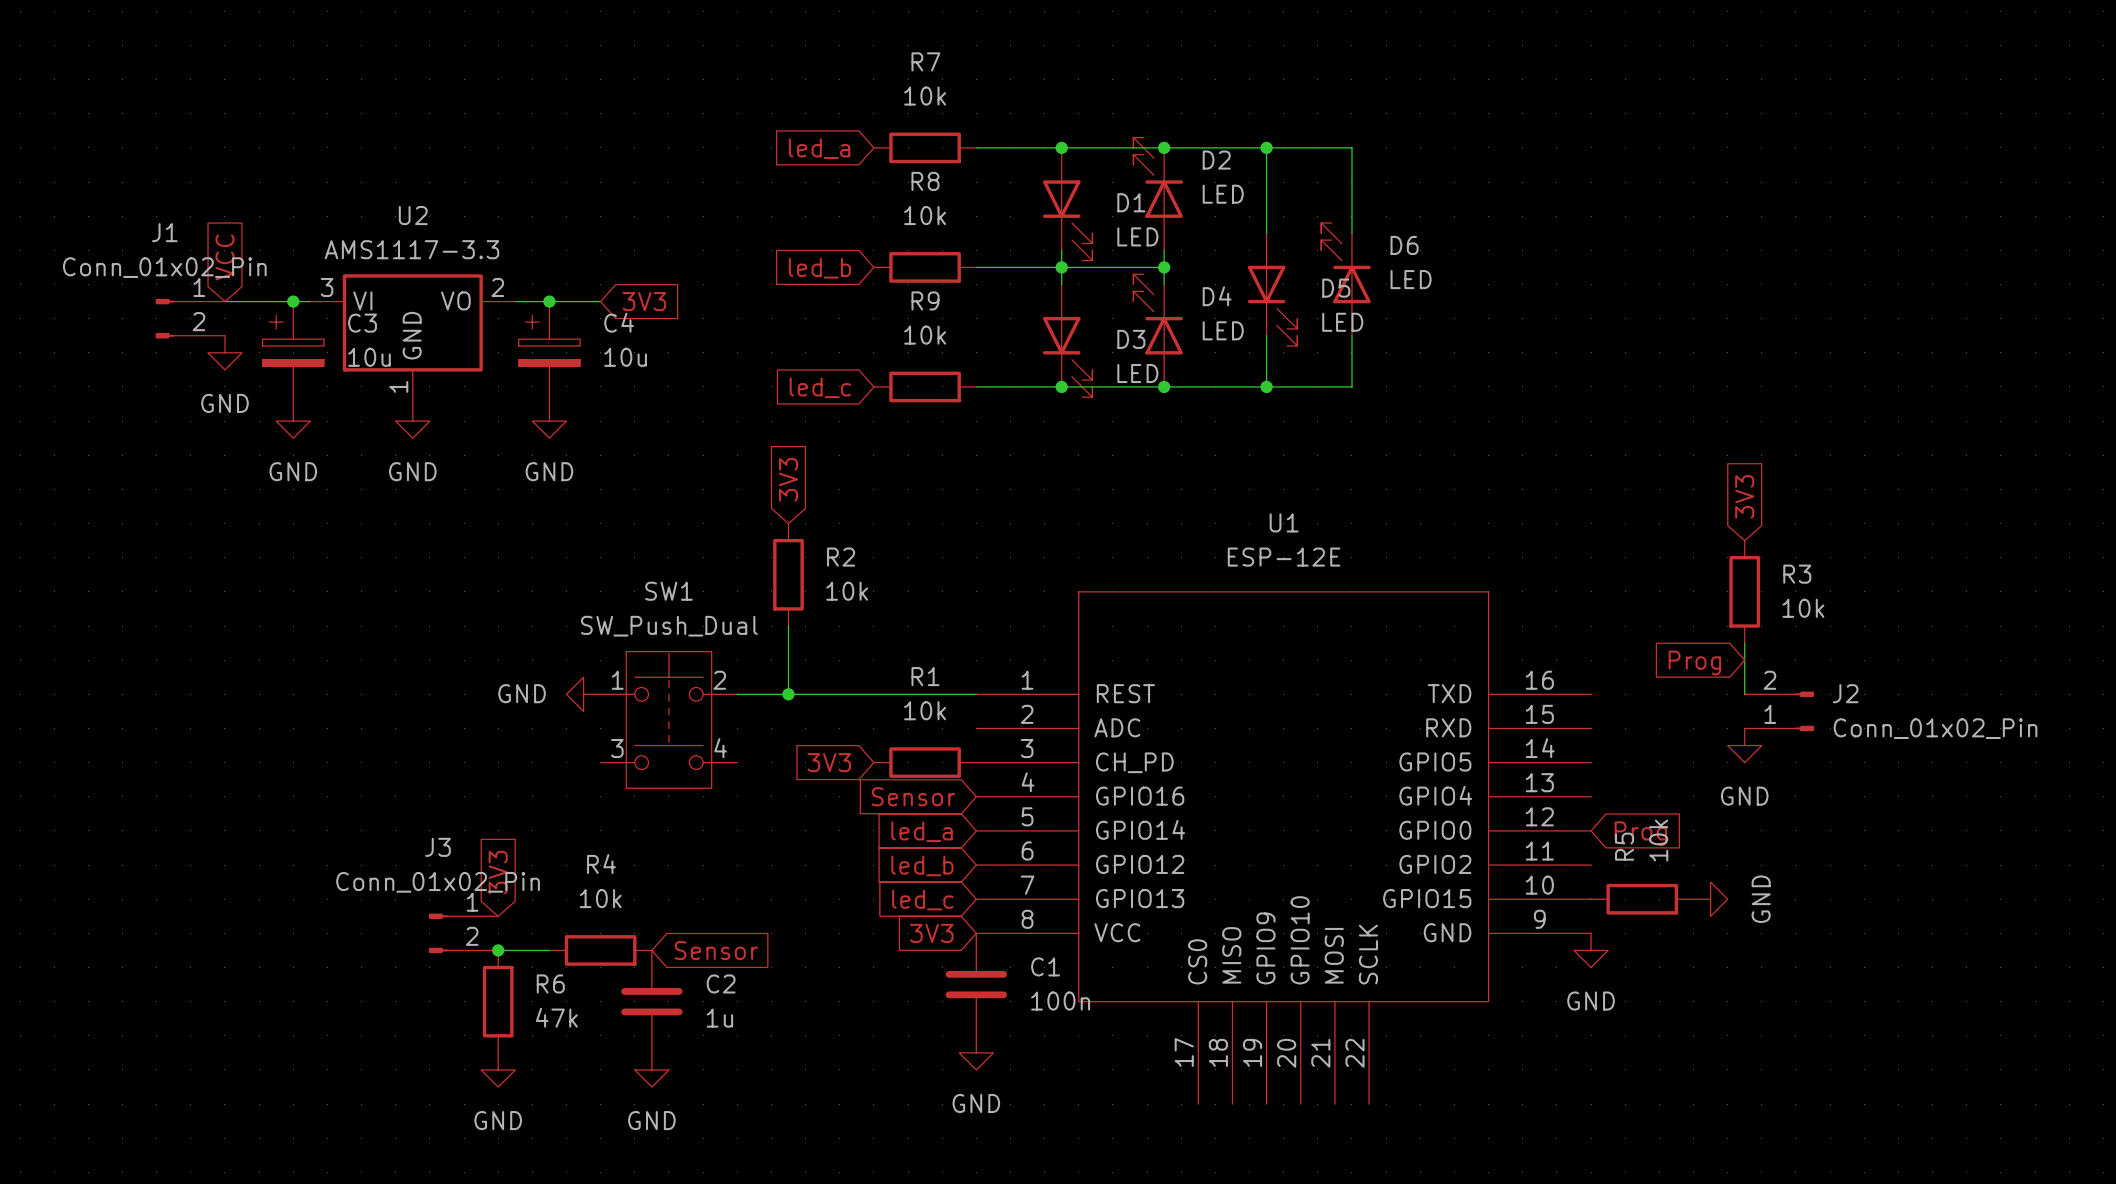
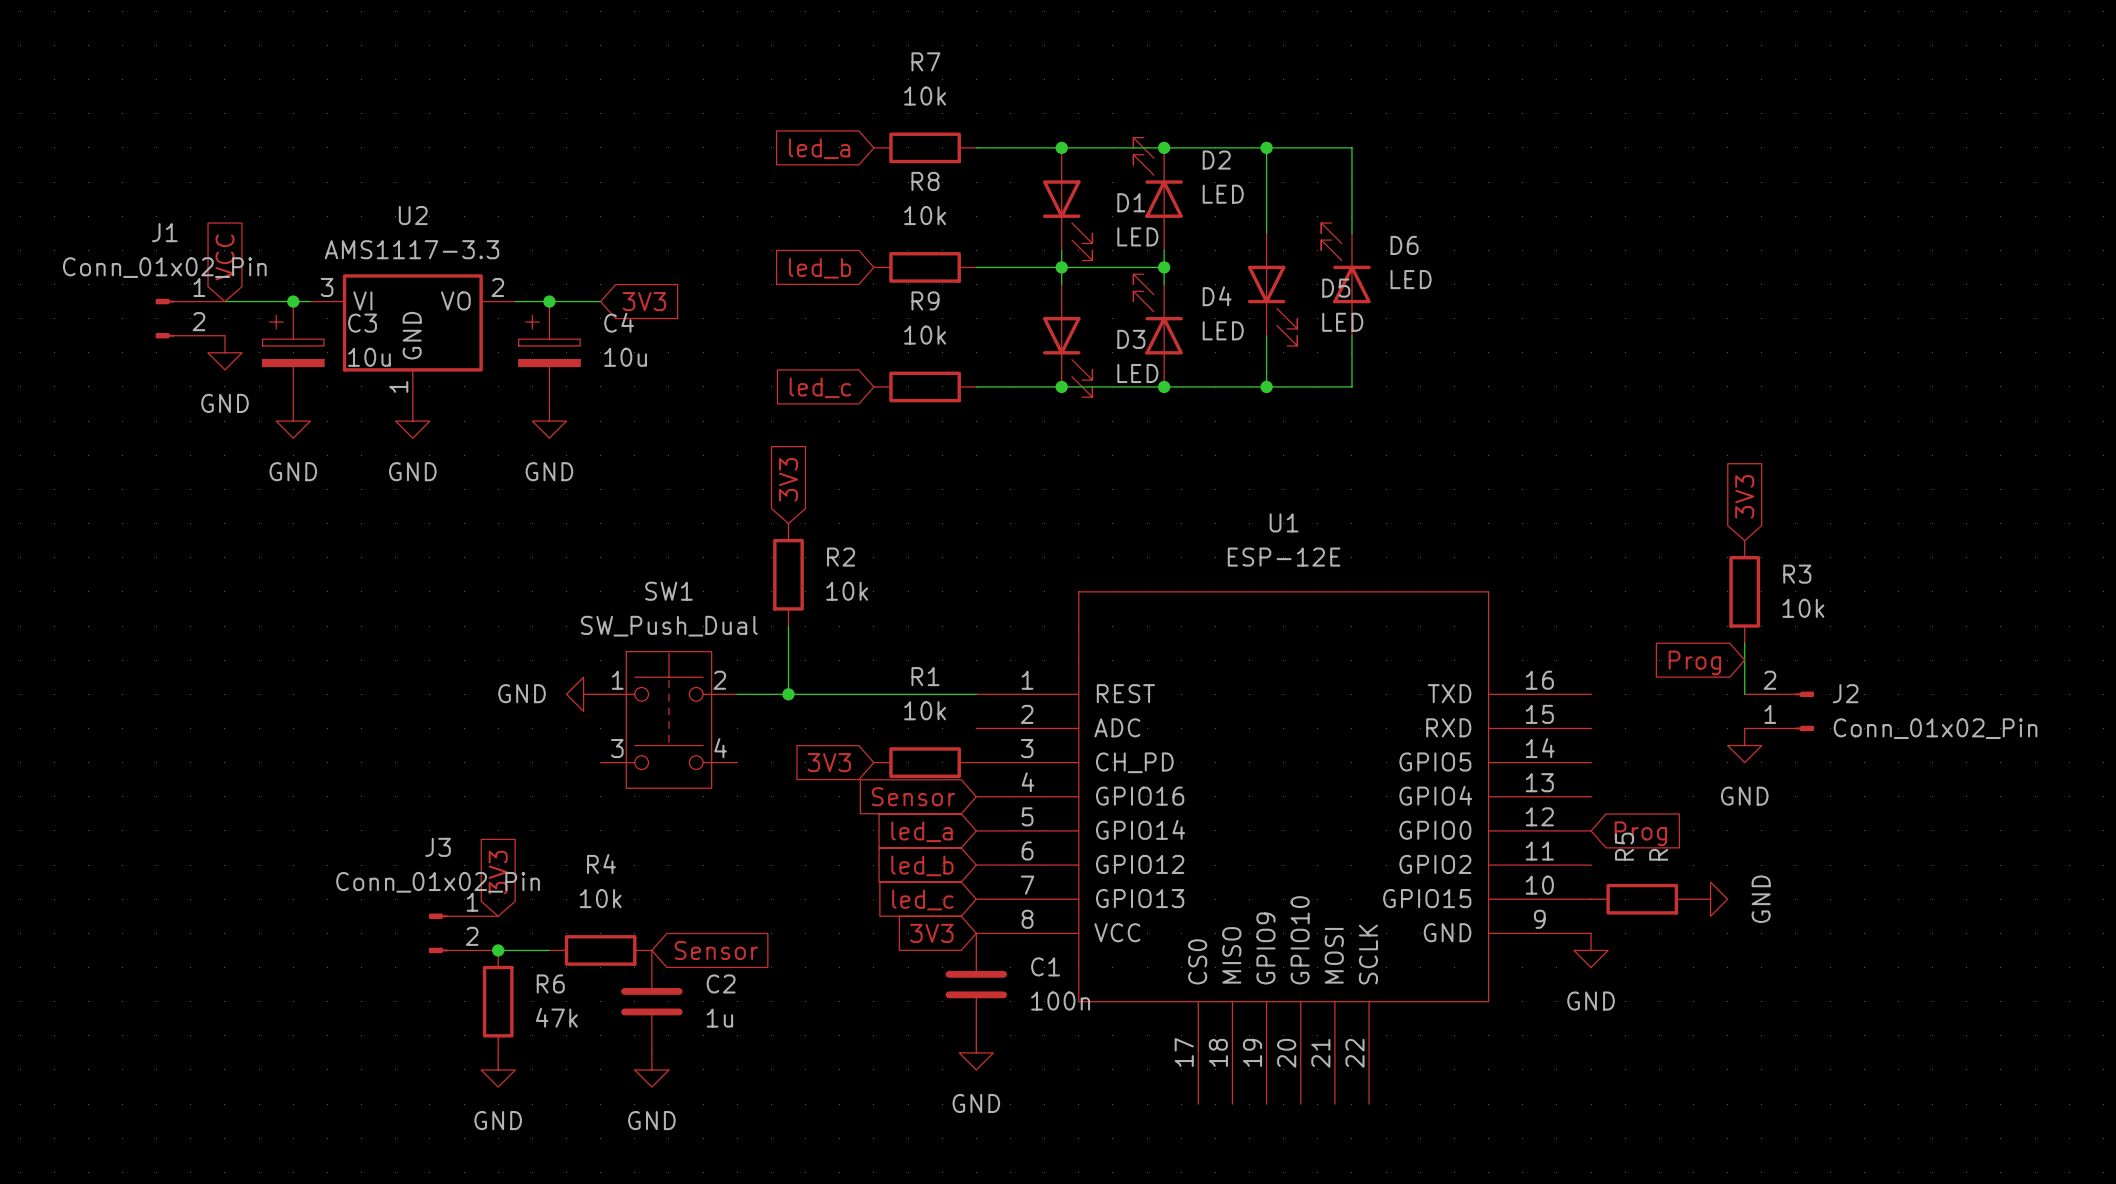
R5 value: 10k (1658, 840) -> R (1658, 854)

